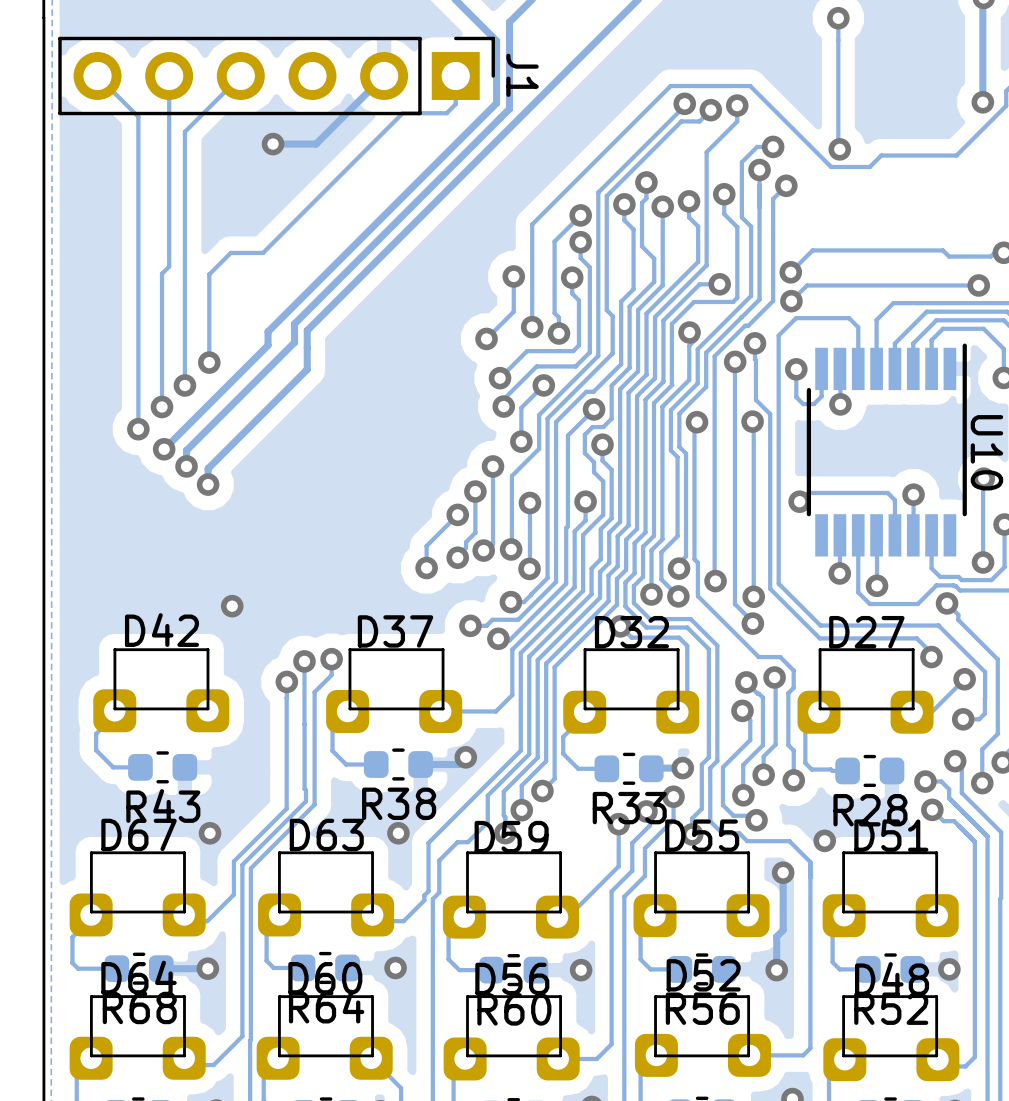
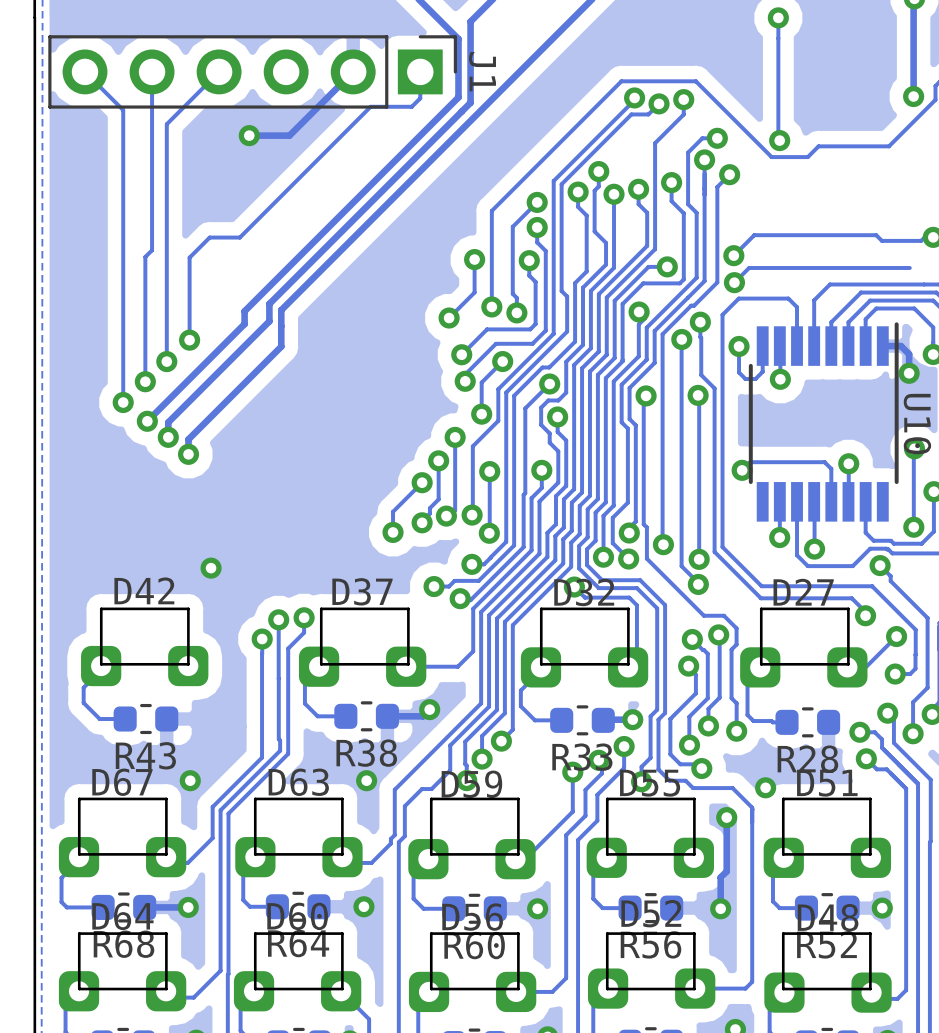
via: (978, 285) -> none
track: none -> (882, 346) (900, 346) (909, 354) (909, 373)
via: none -> (909, 373)

